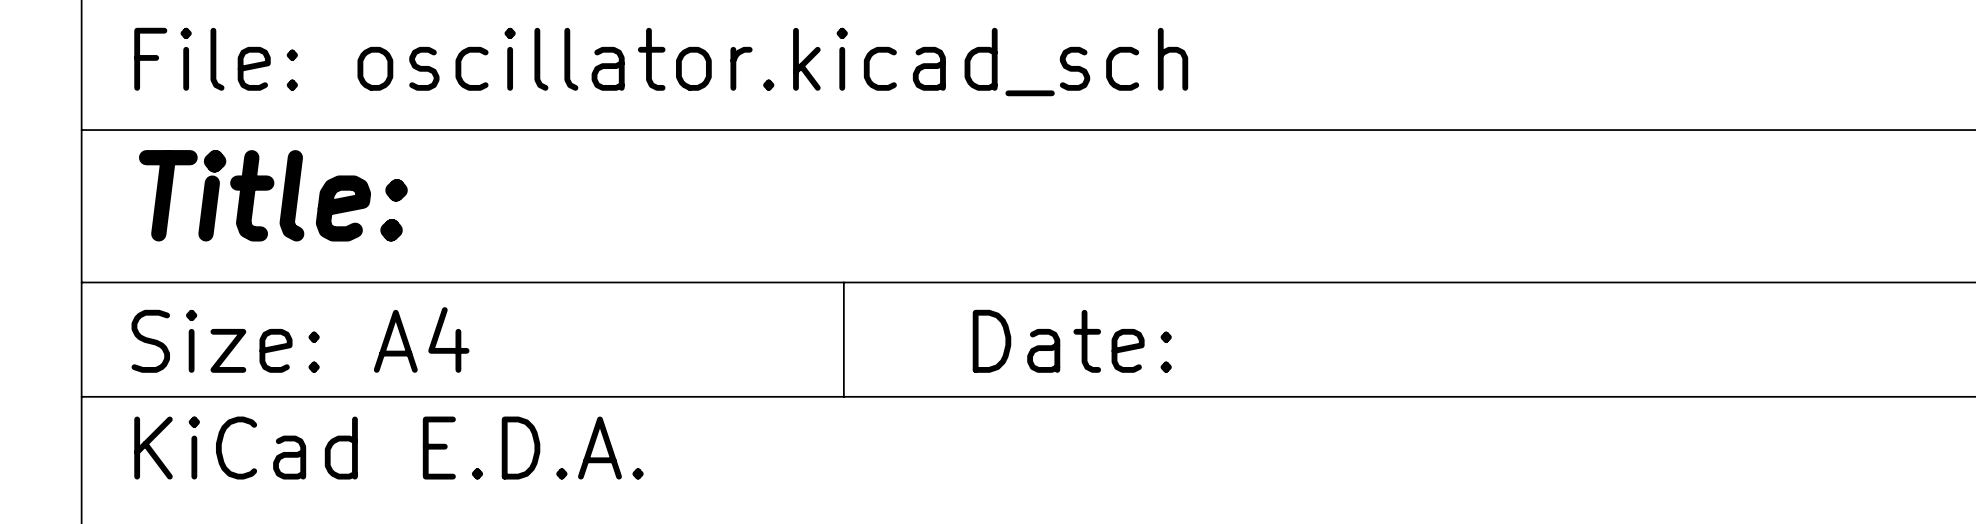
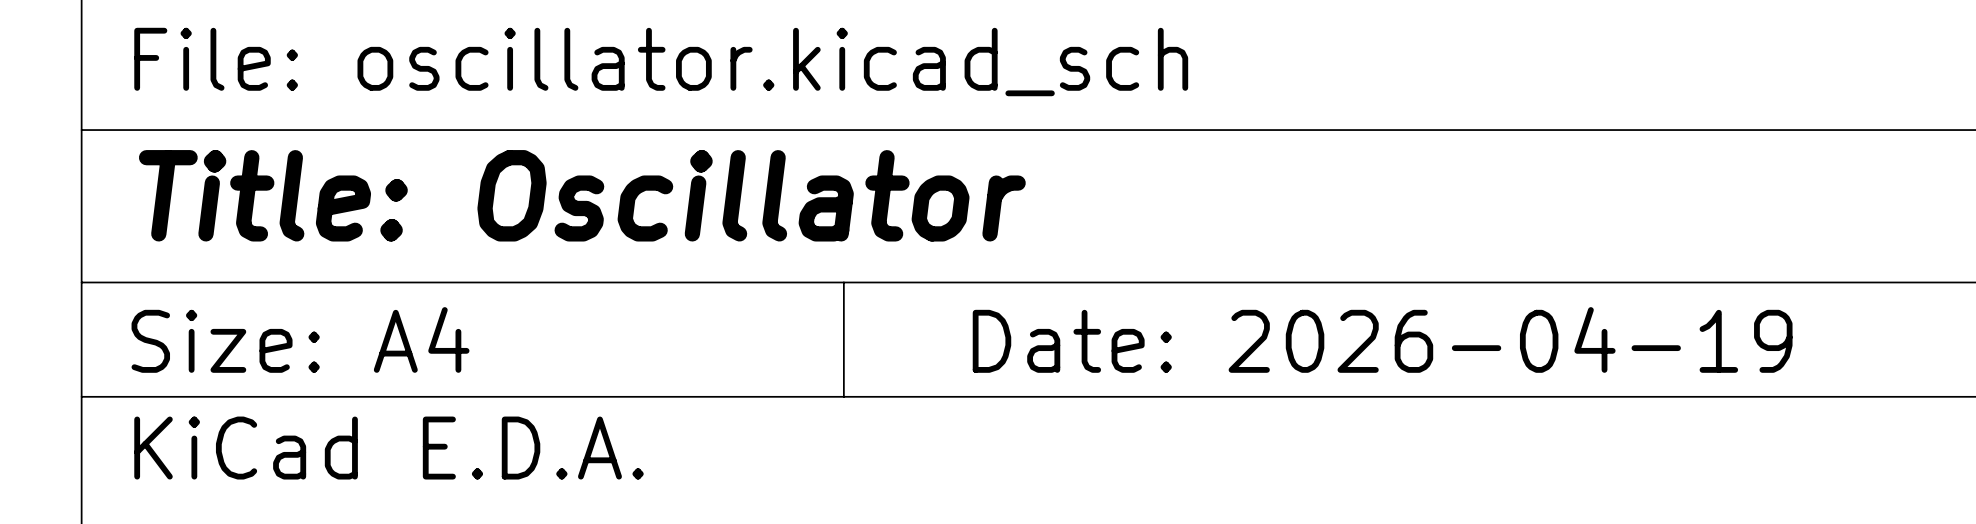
title block: Title: (273, 195) -> Title: Oscillator (582, 195)
title block: Date: (1072, 341) -> Date: 2026-04-19 (1382, 339)

